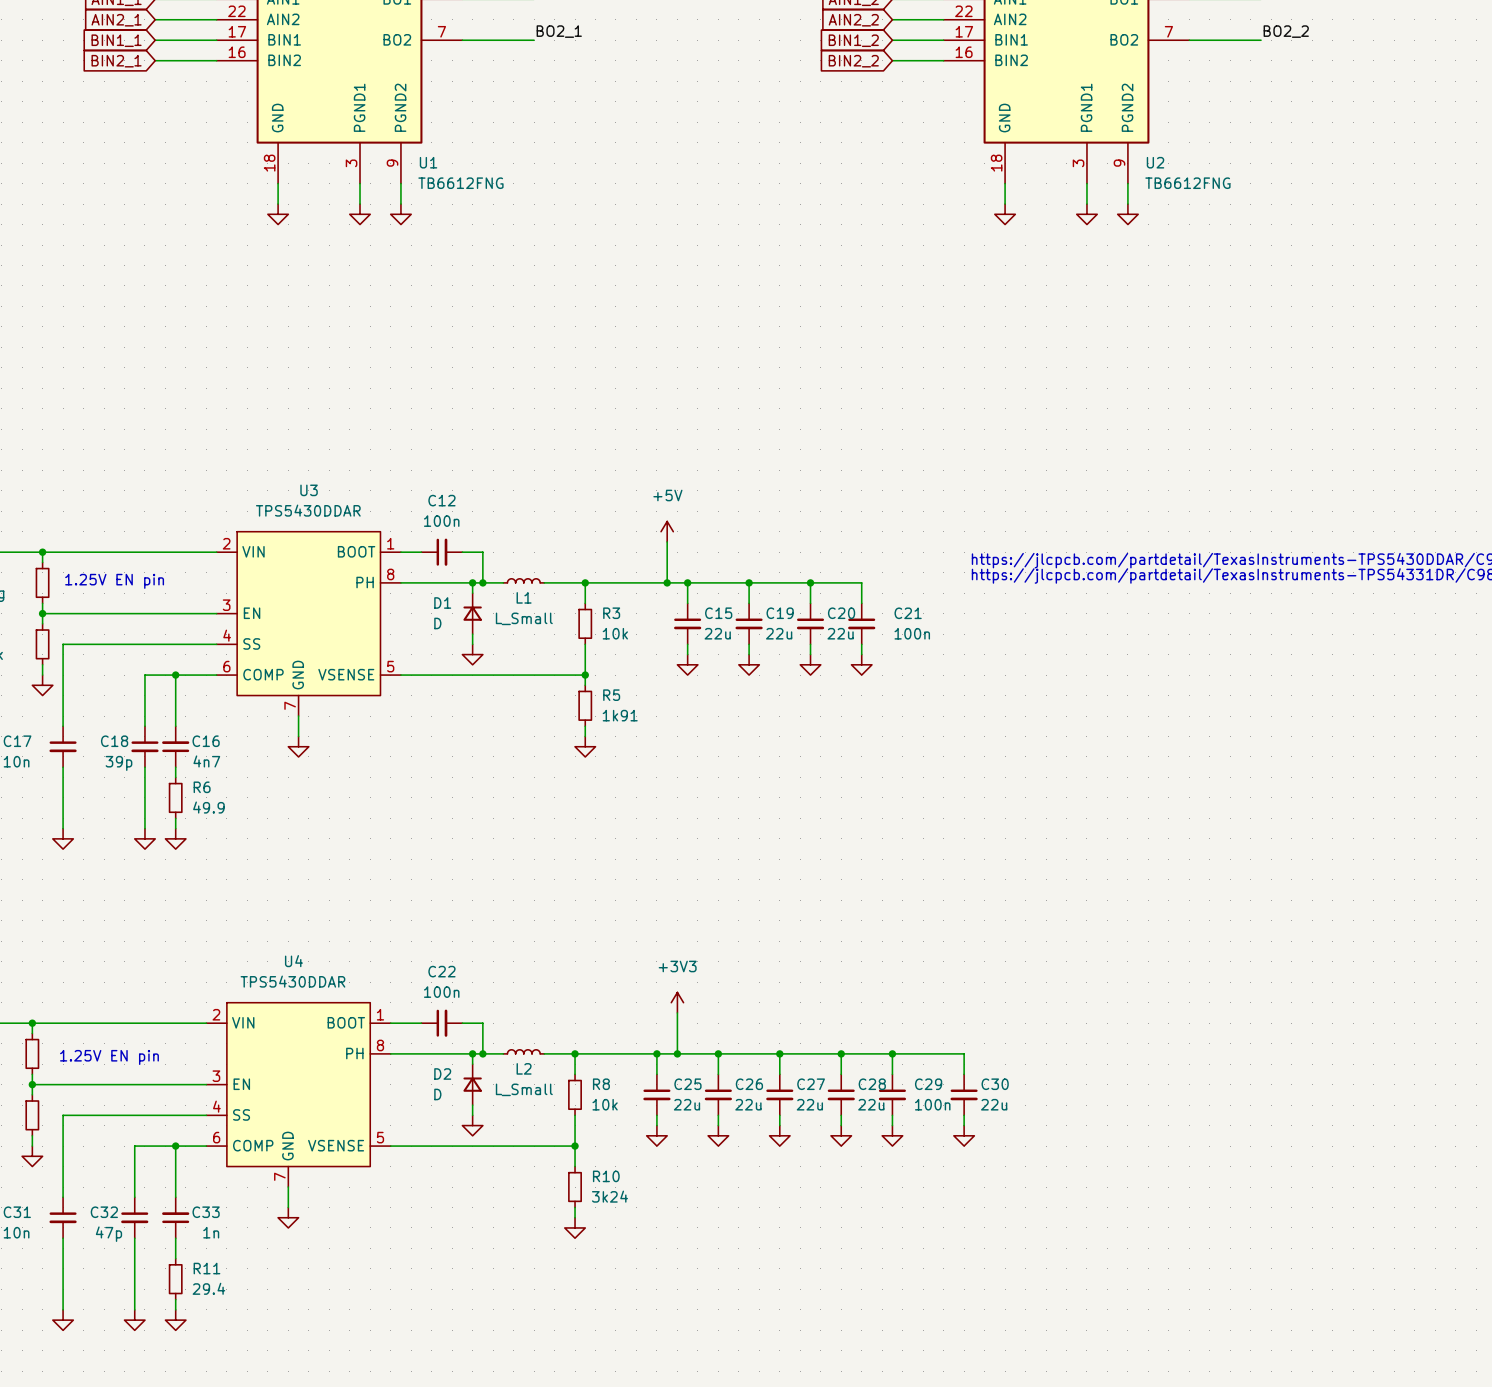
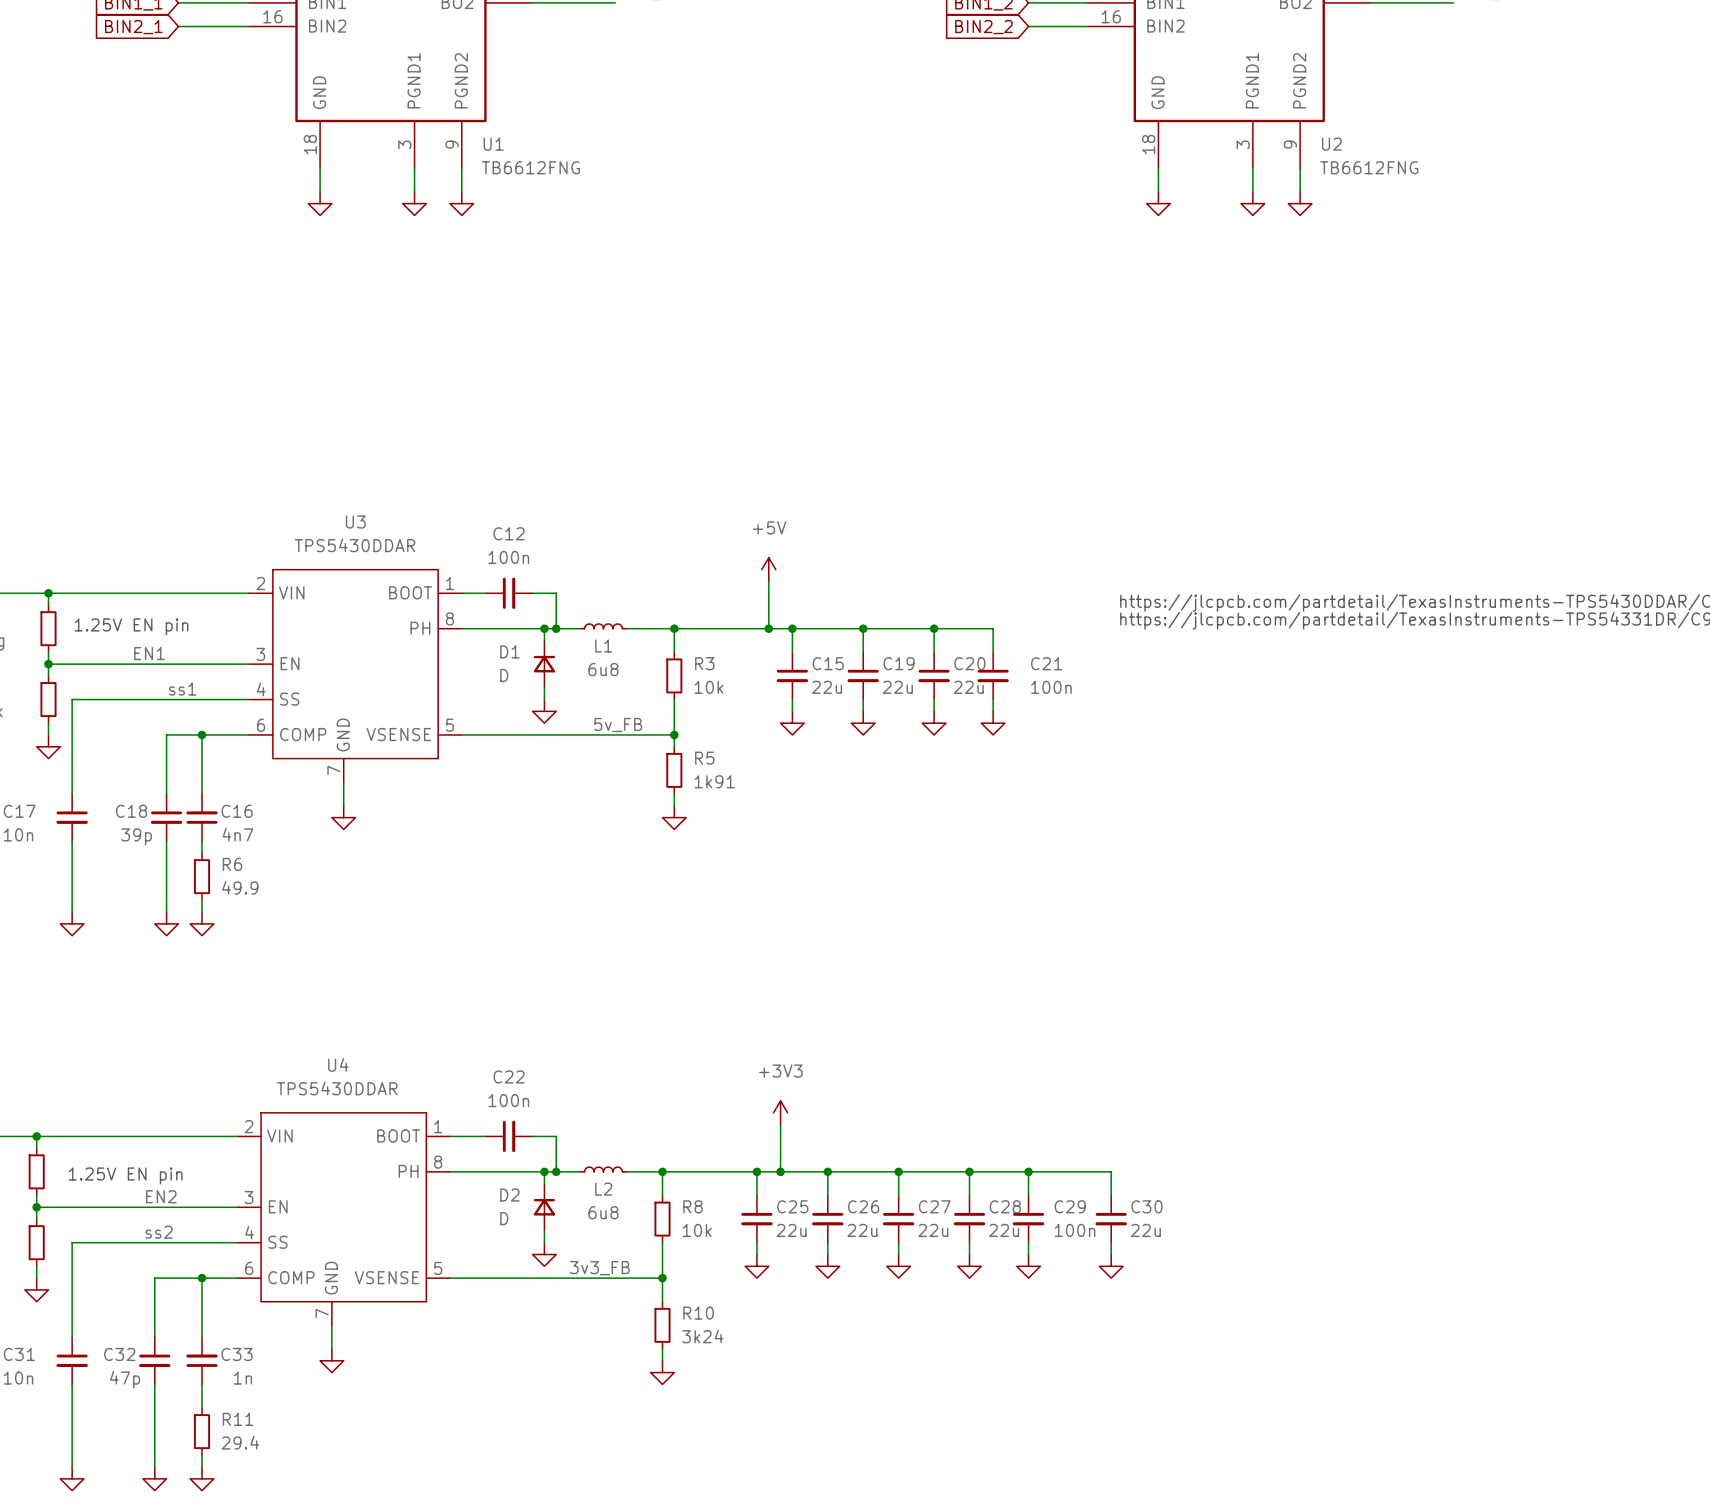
label: none -> EN1 (149, 653)
L1 value: L_Small (524, 618) -> 6u8 (603, 669)
label: none -> ss1 (182, 689)
label: none -> 5v_FB (618, 725)
label: none -> EN2 (161, 1196)
L2 value: L_Small (524, 1089) -> 6u8 (603, 1212)
label: none -> ss2 (159, 1232)
label: none -> 3v3_FB (599, 1268)

